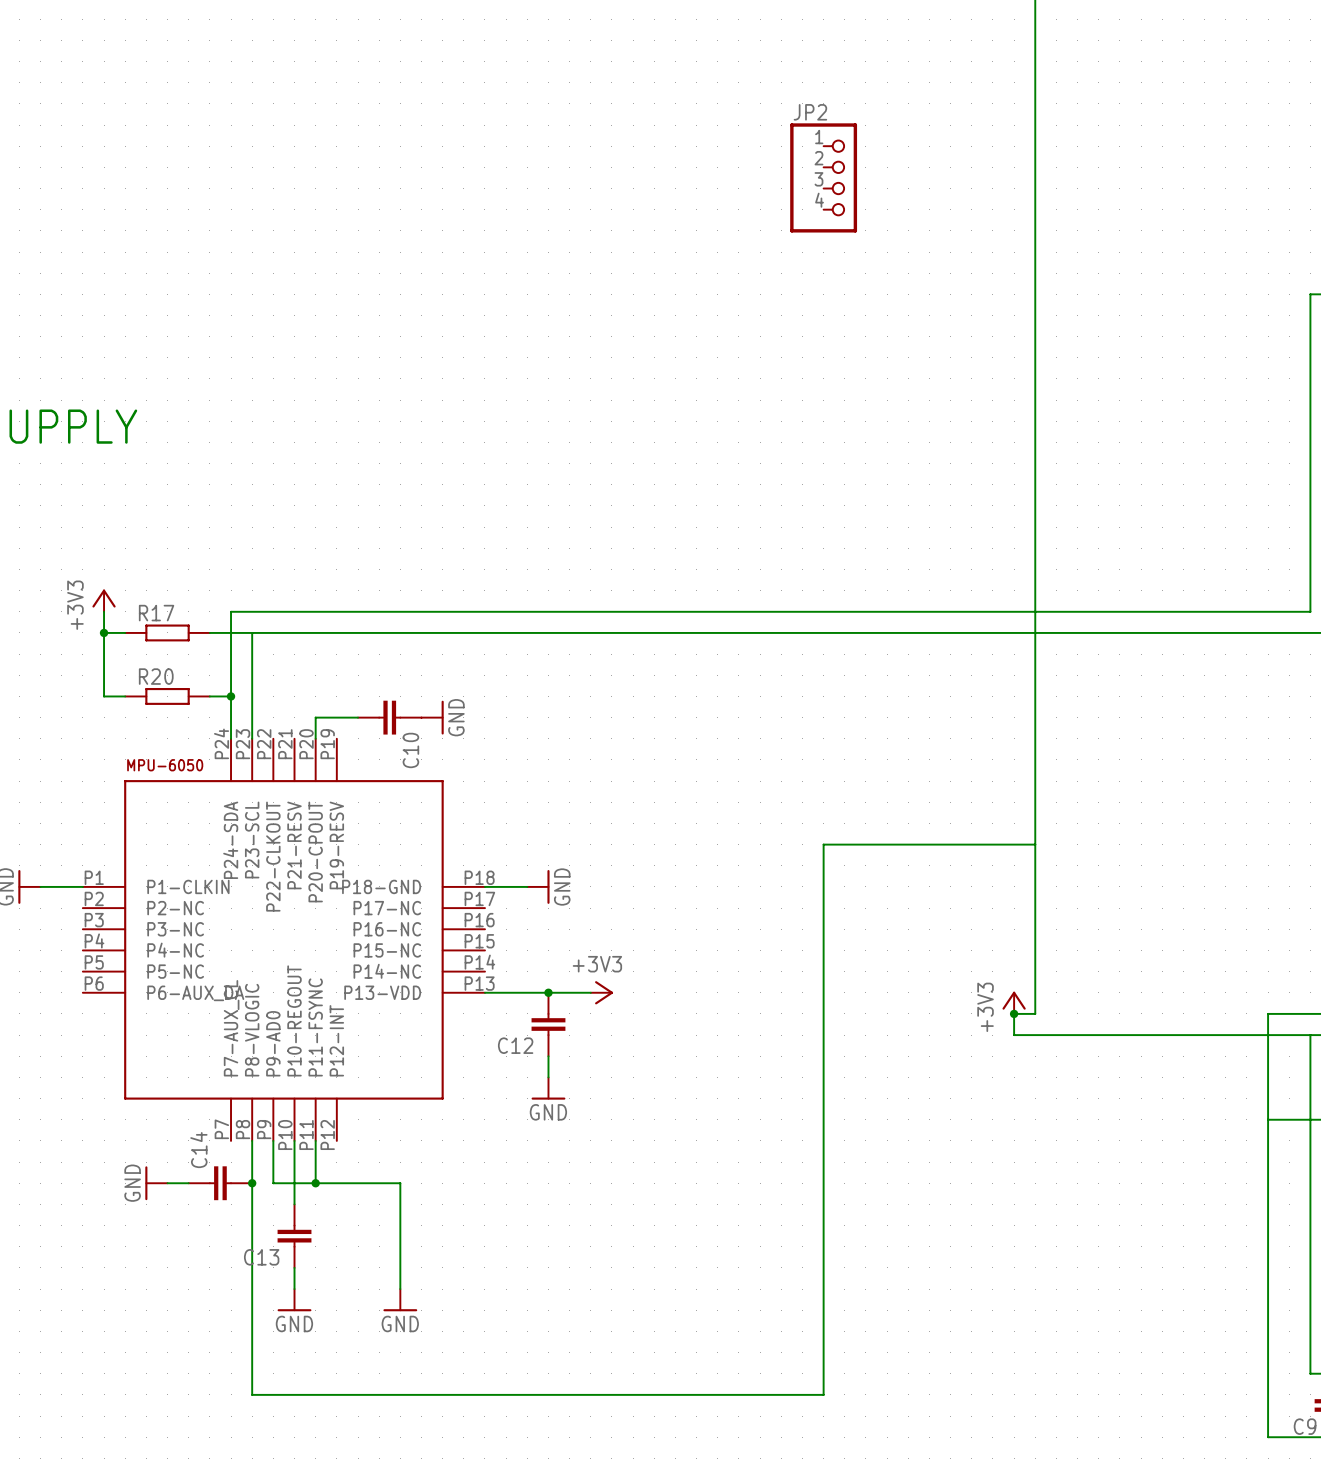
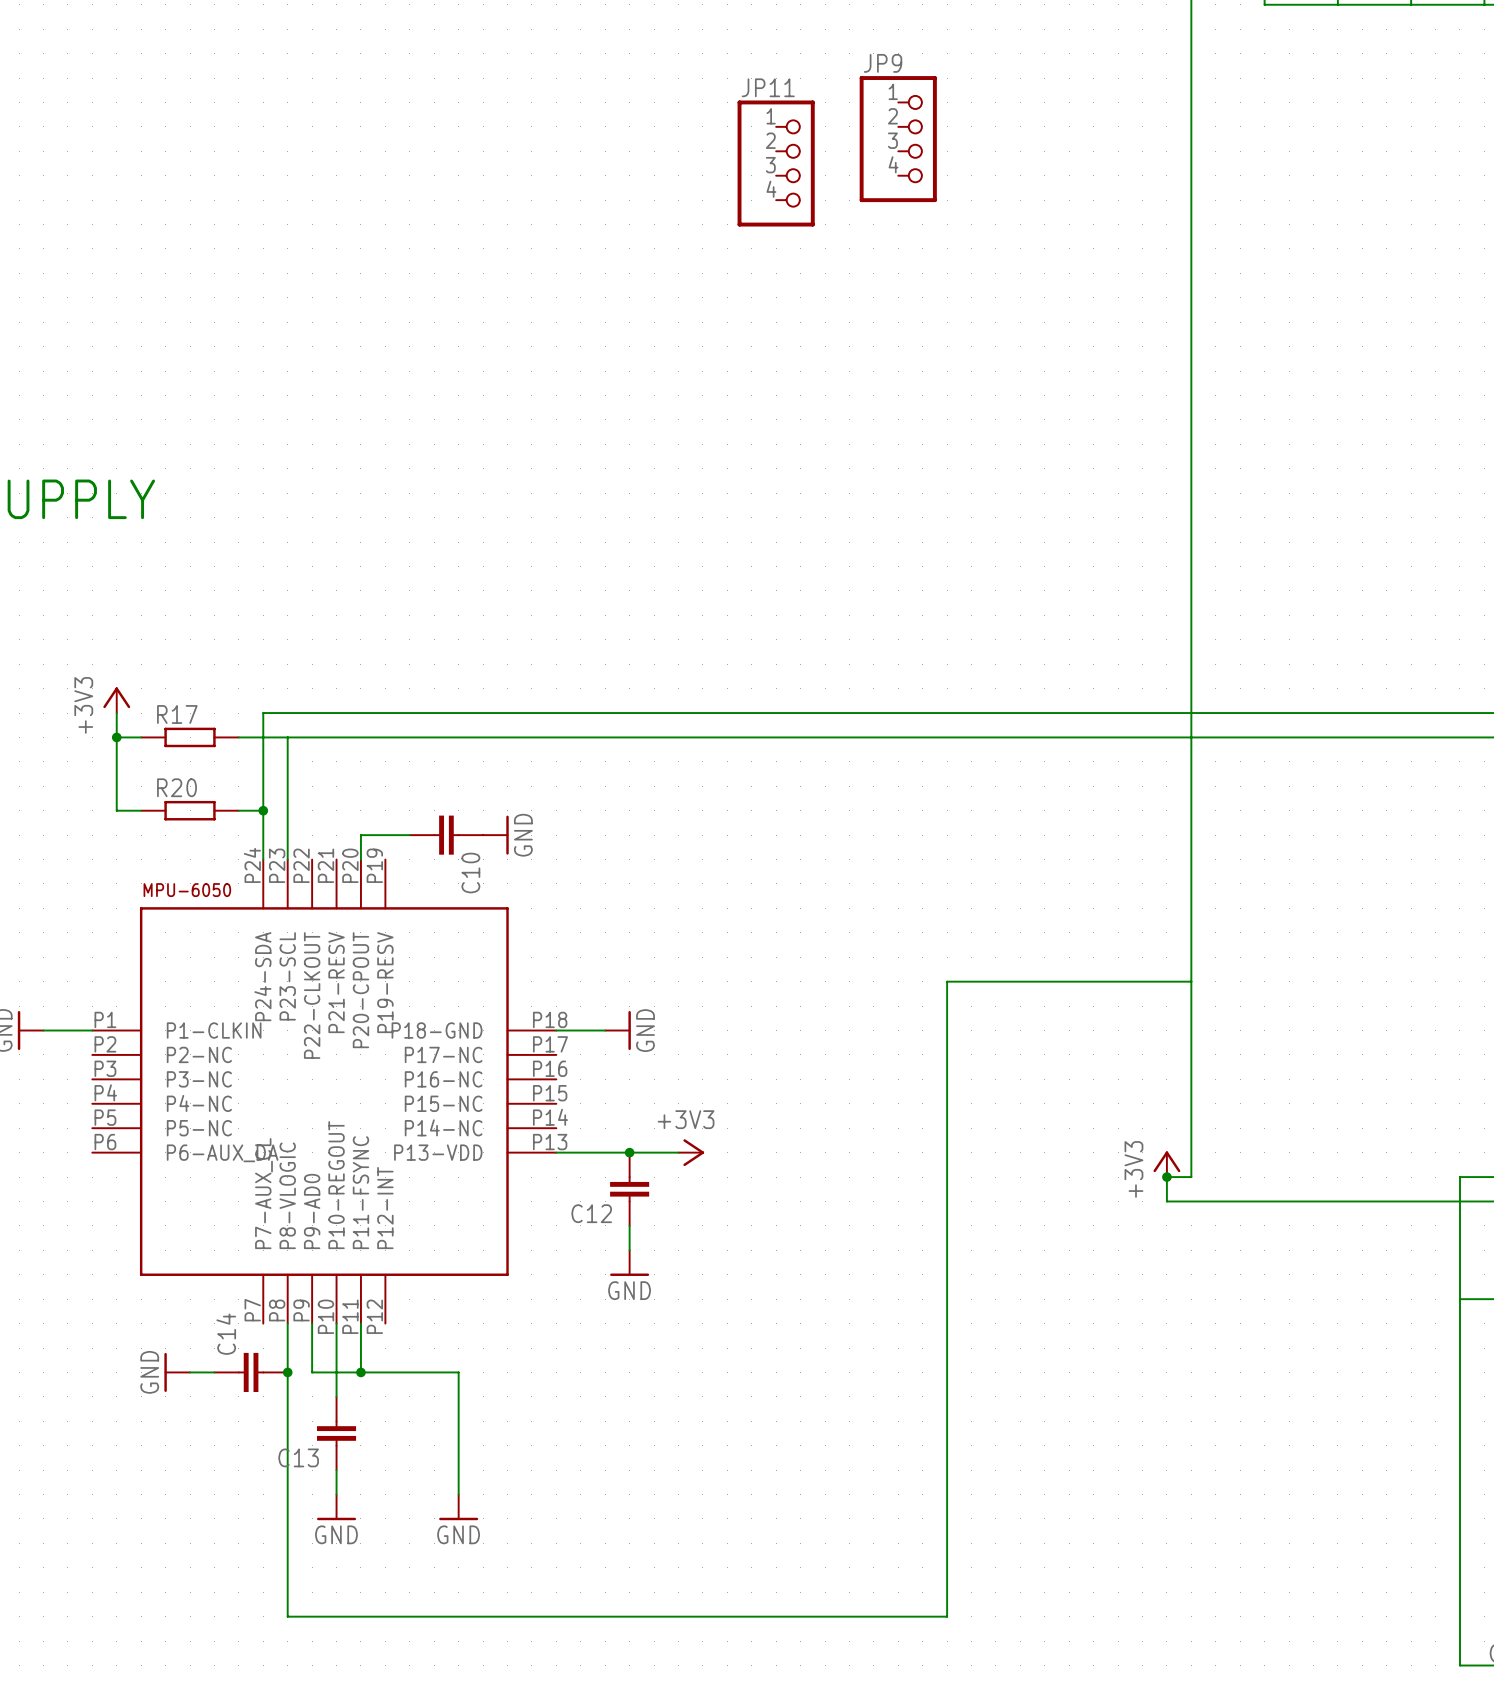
JP9: none -> (898, 139)
JP11: none -> (776, 163)
JP2: (823, 177) -> none

